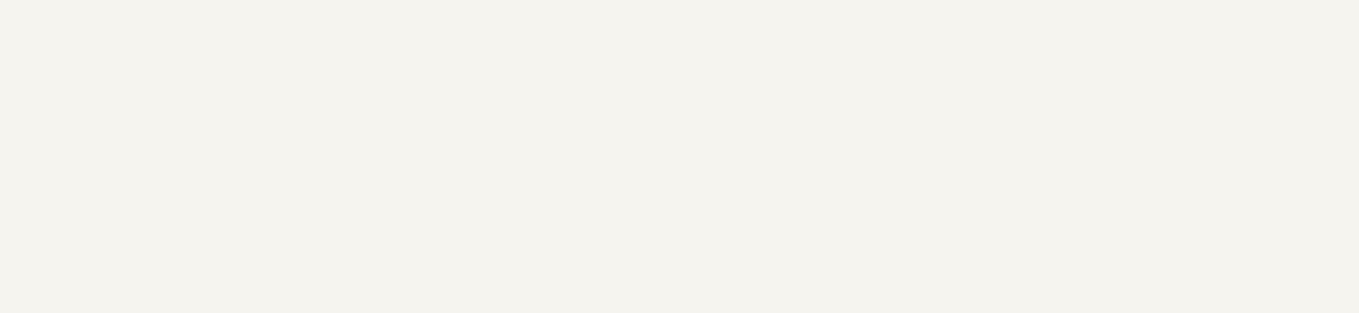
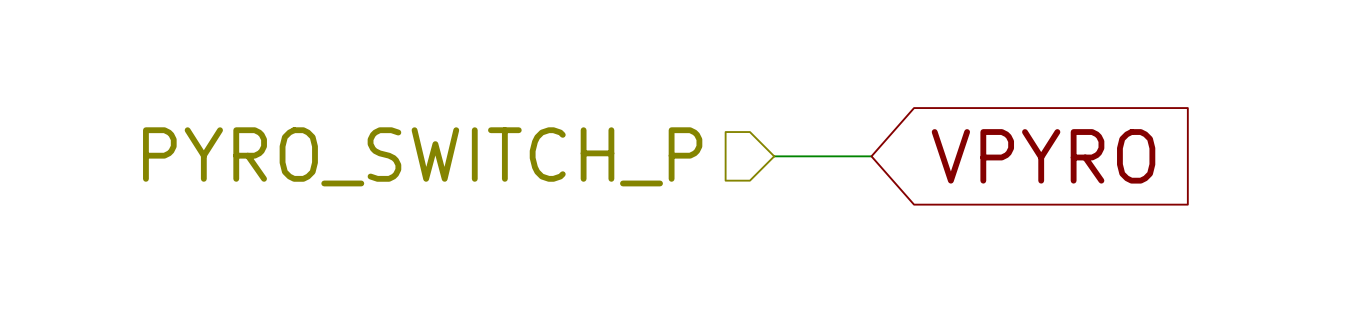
hierarchical label: none -> PYRO_SWITCH_P (422, 156)
wire: none -> (774, 156) (871, 156)
global label: none -> VPYRO (1043, 156)

